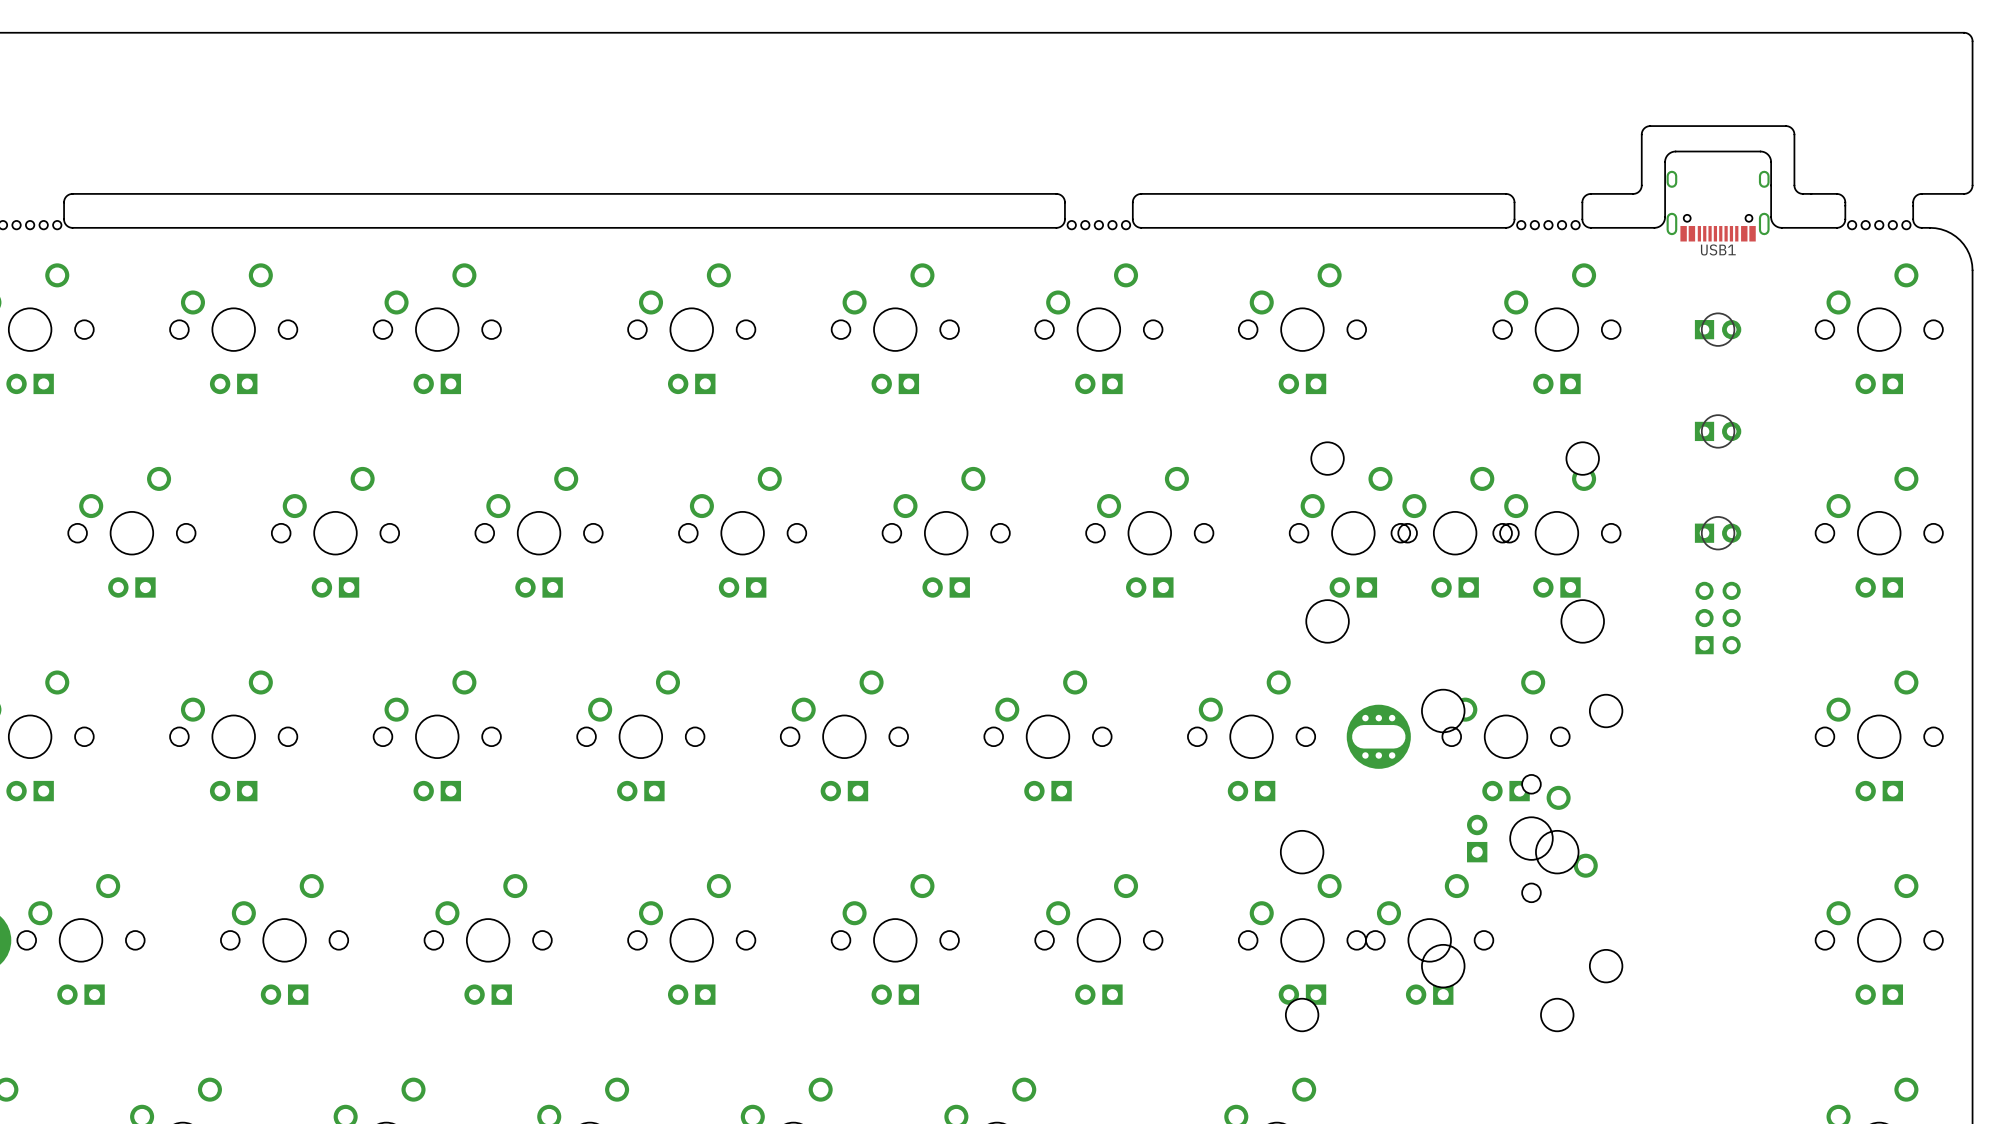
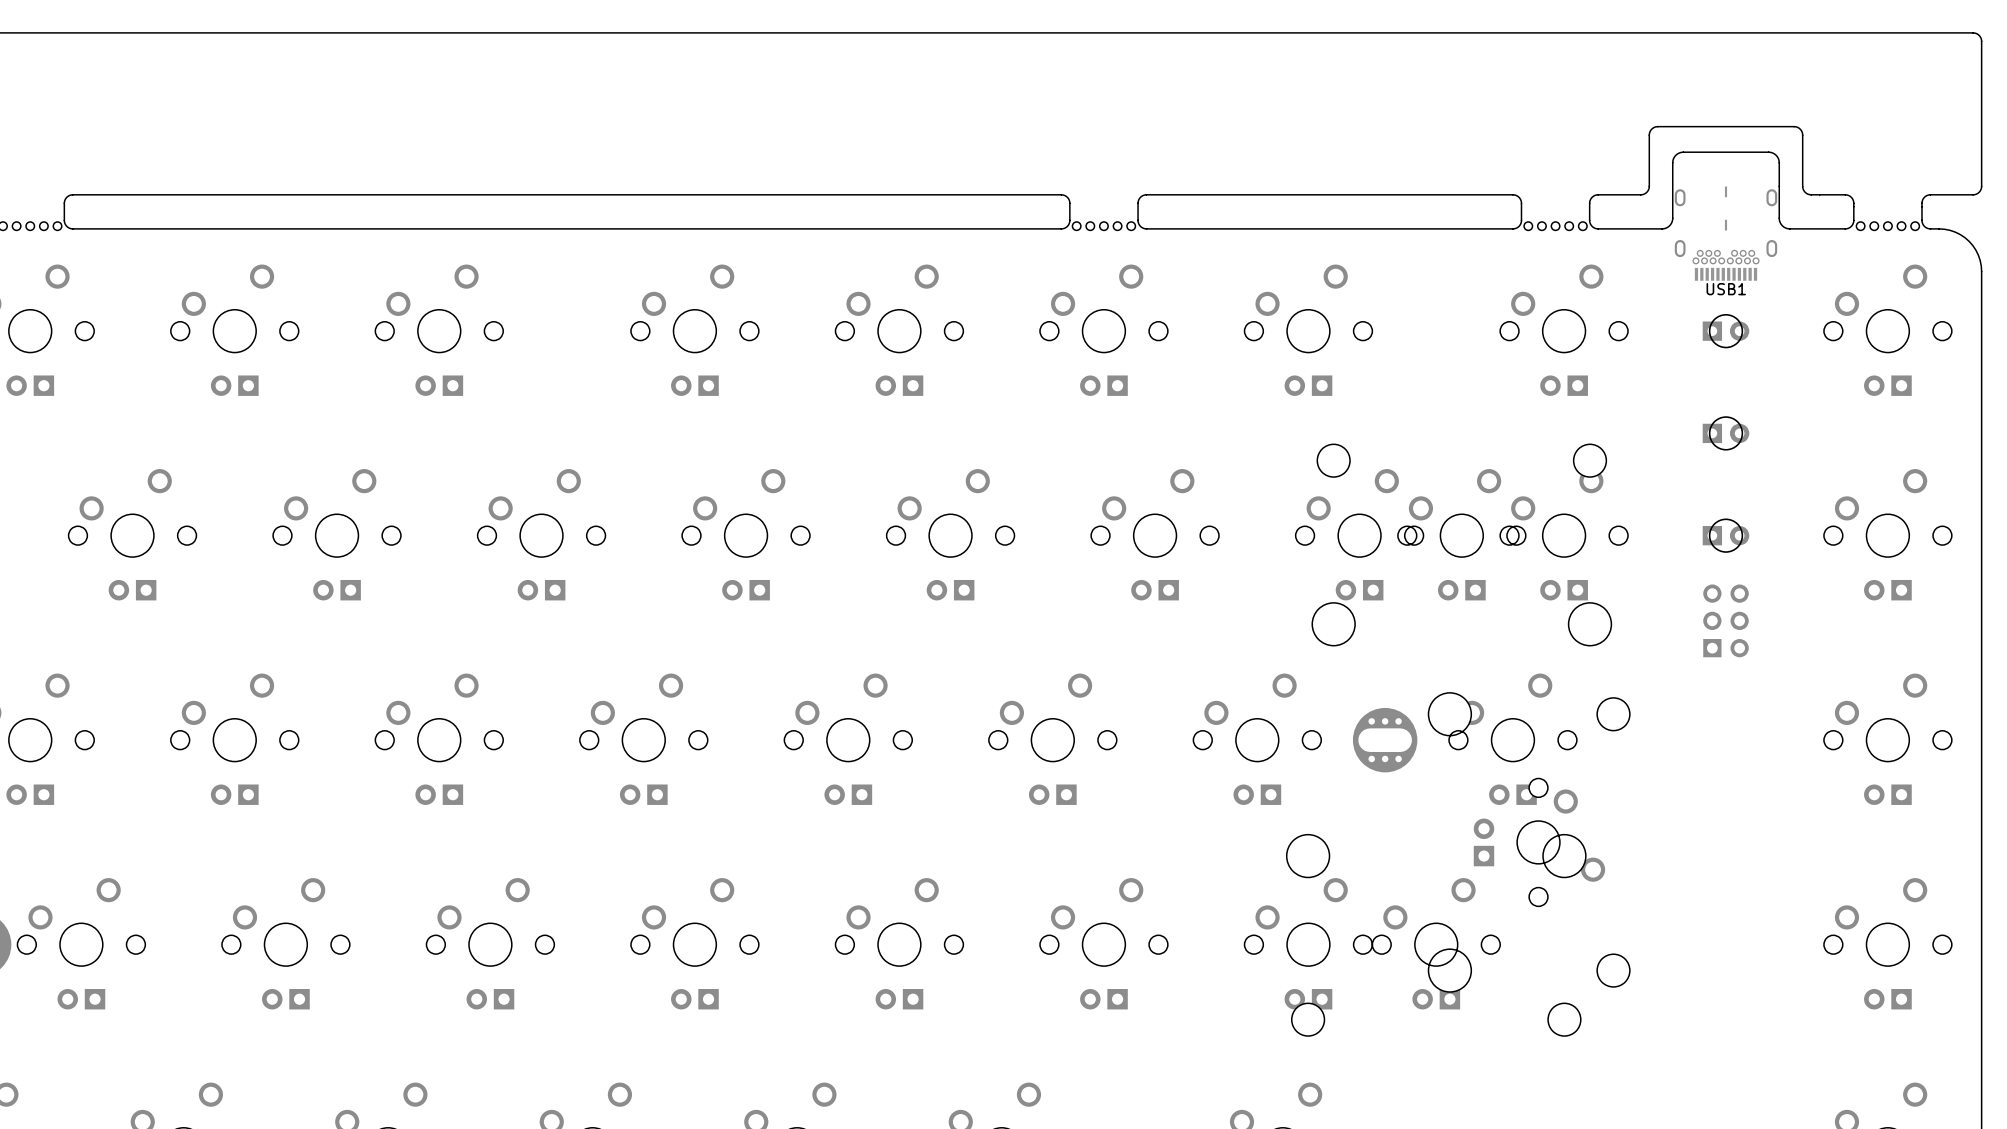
USB1 footprint: [1666, 170, 1770, 242] -> [1674, 186, 1778, 281]

